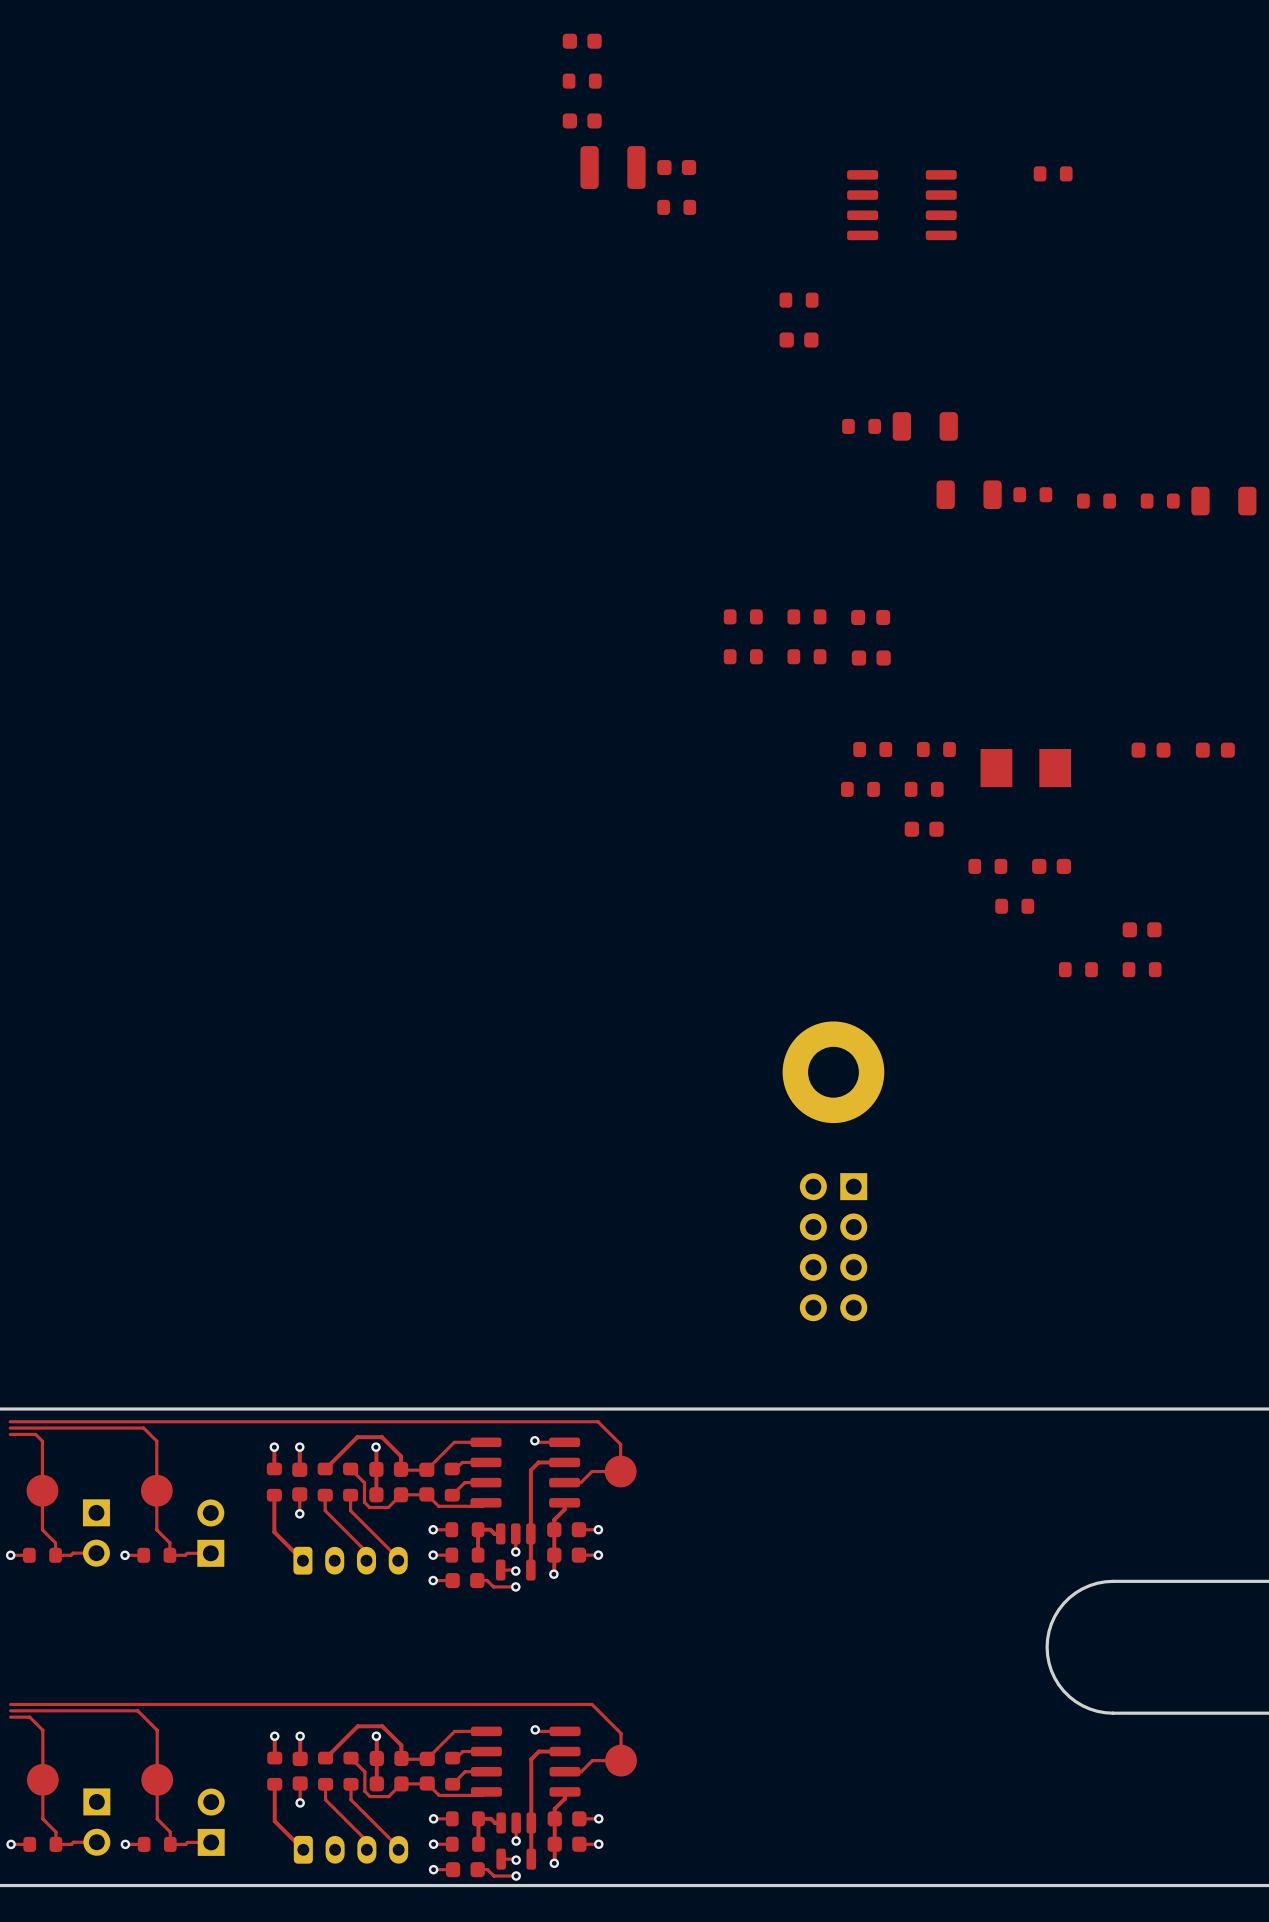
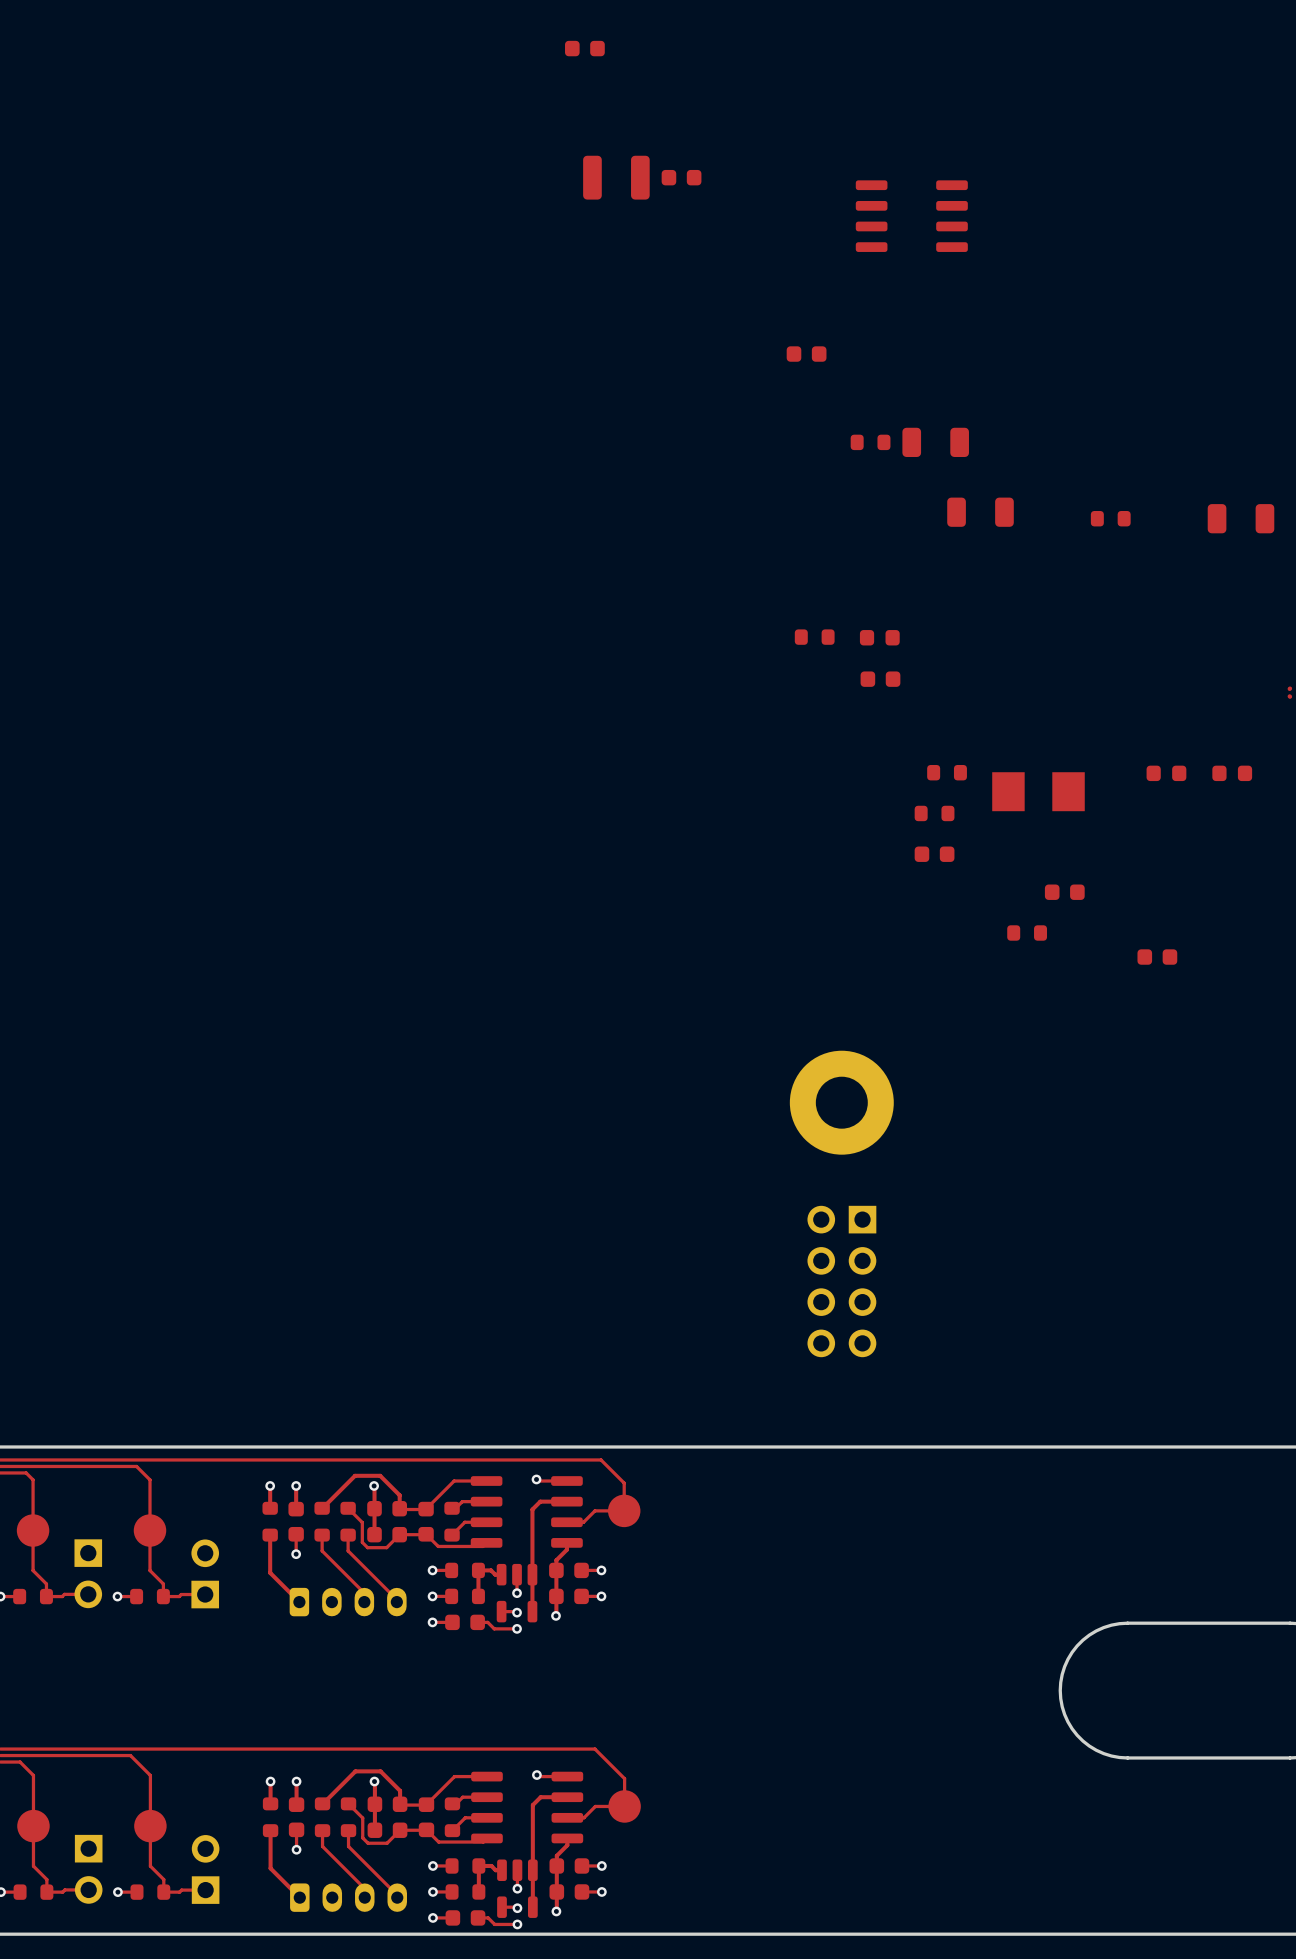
part: (582, 81) -> none
part: (582, 120) -> none
part: (1053, 173) -> none
part: (676, 207) -> none
part: (799, 300) -> none
part: (1032, 494) -> none
part: (1160, 501) -> none
part: (743, 616) -> none
part: (743, 656) -> none
part: (806, 656) -> none
part: (872, 749) -> none
part: (860, 789) -> none
part: (987, 866) -> none
part: (1078, 969) -> none
part: (1142, 969) -> none

